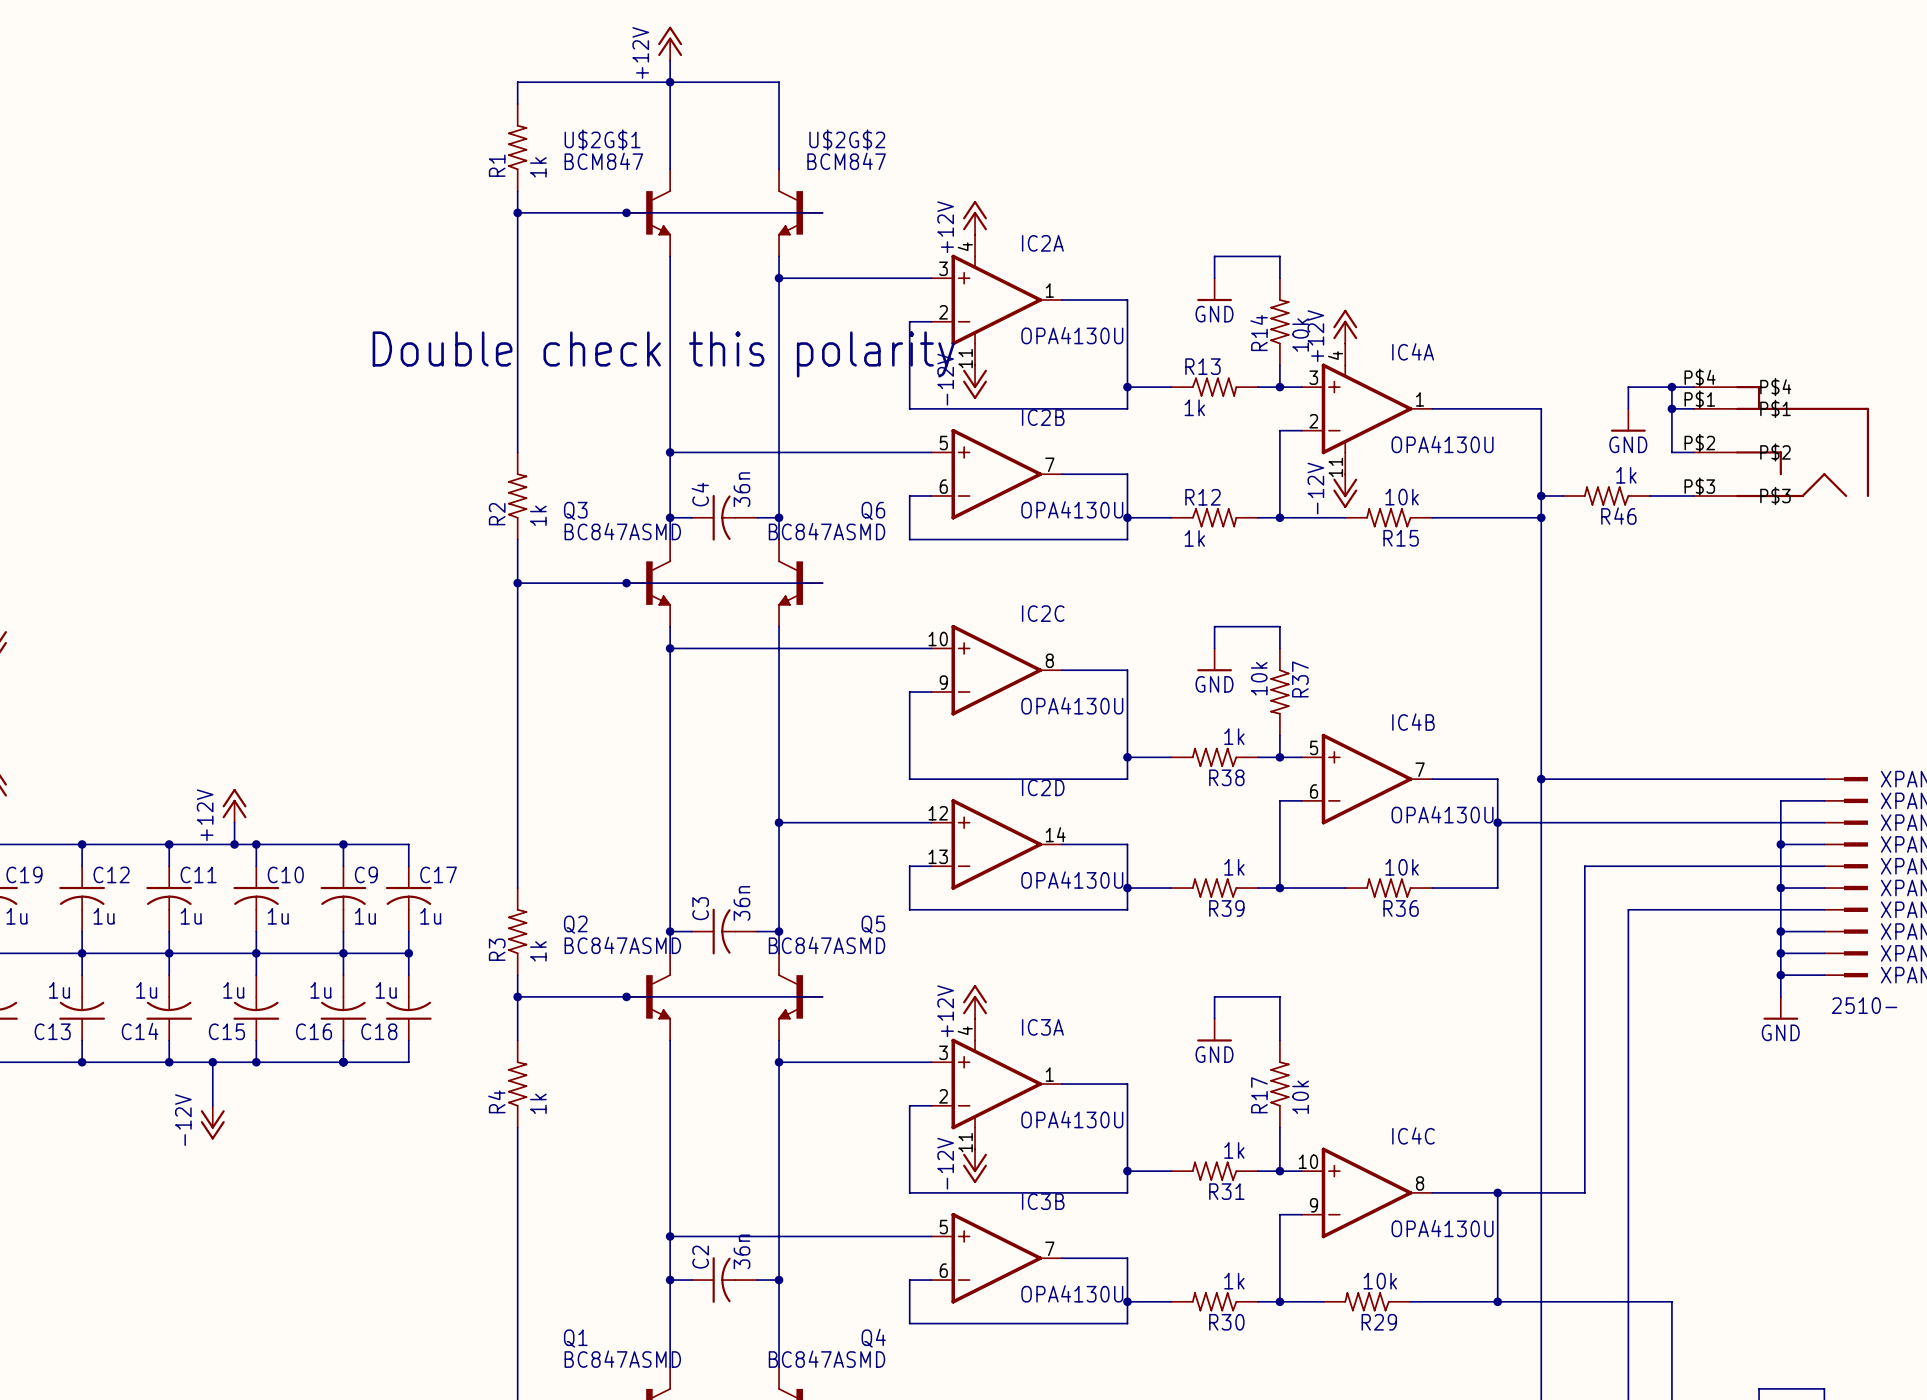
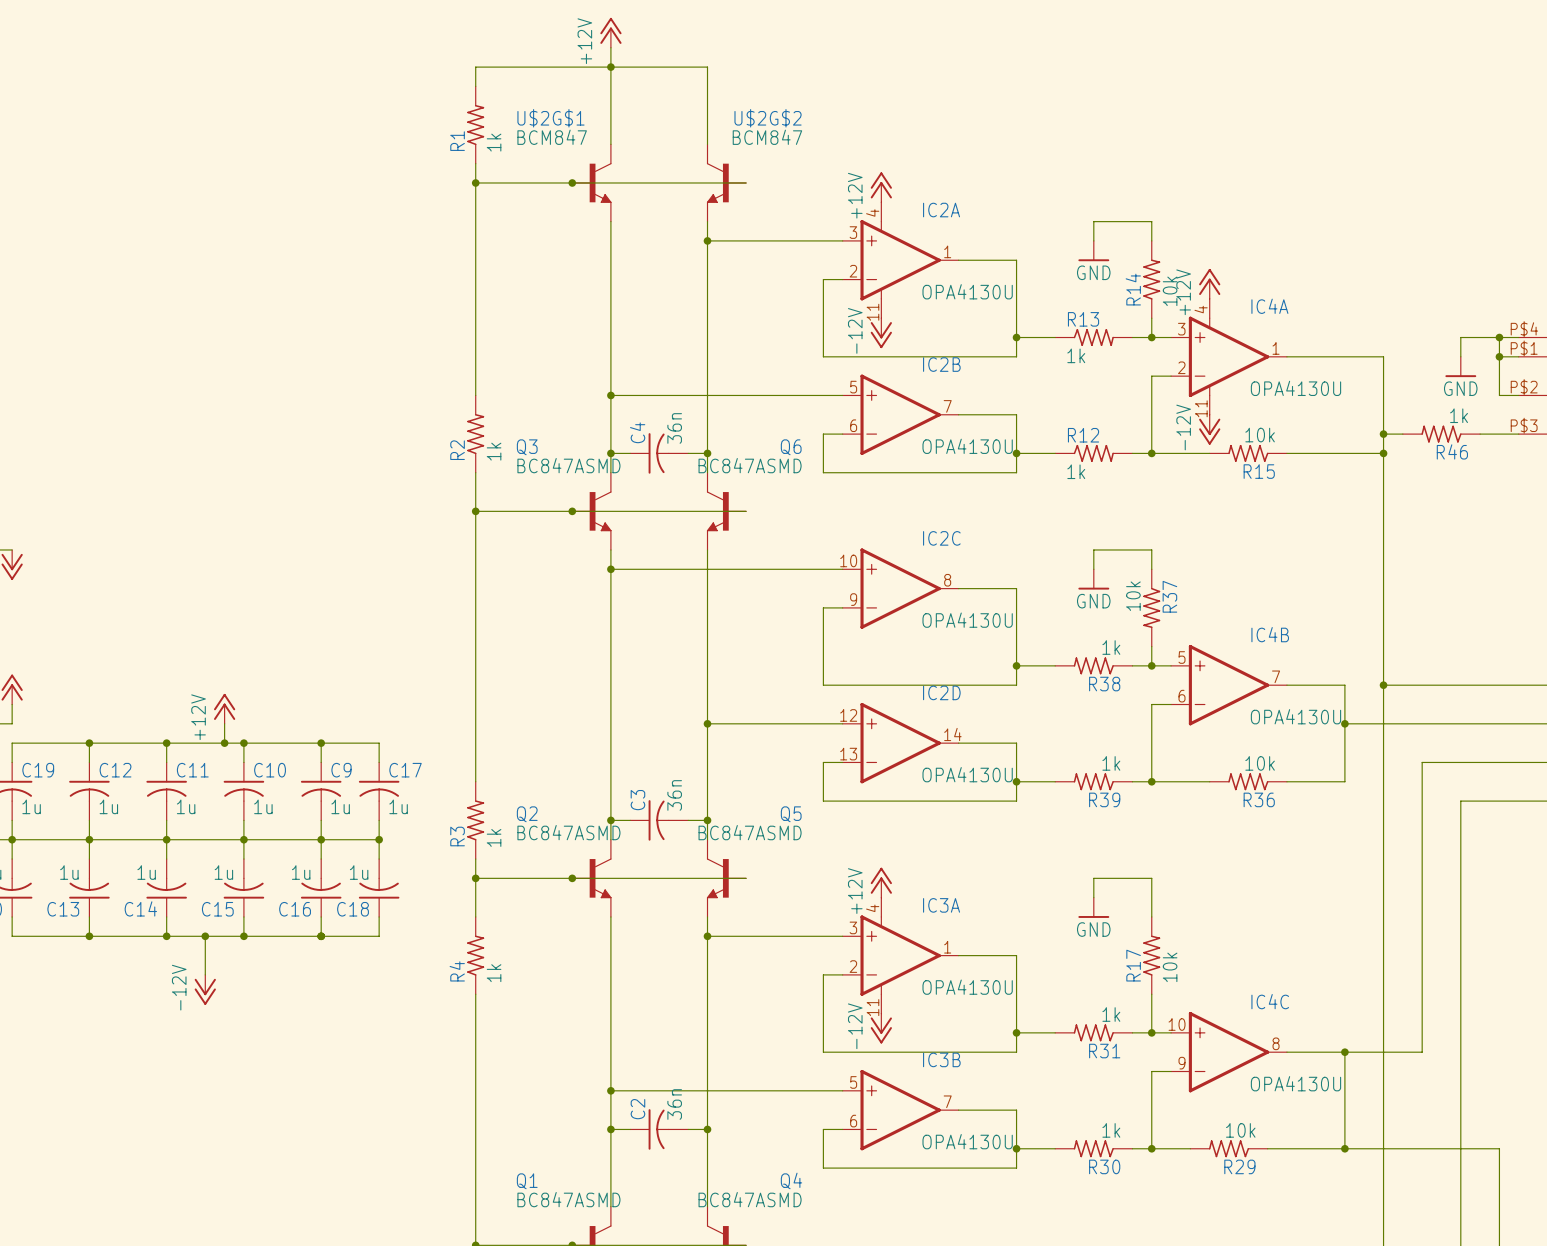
text: Double check this polarity (663, 354) -> none

